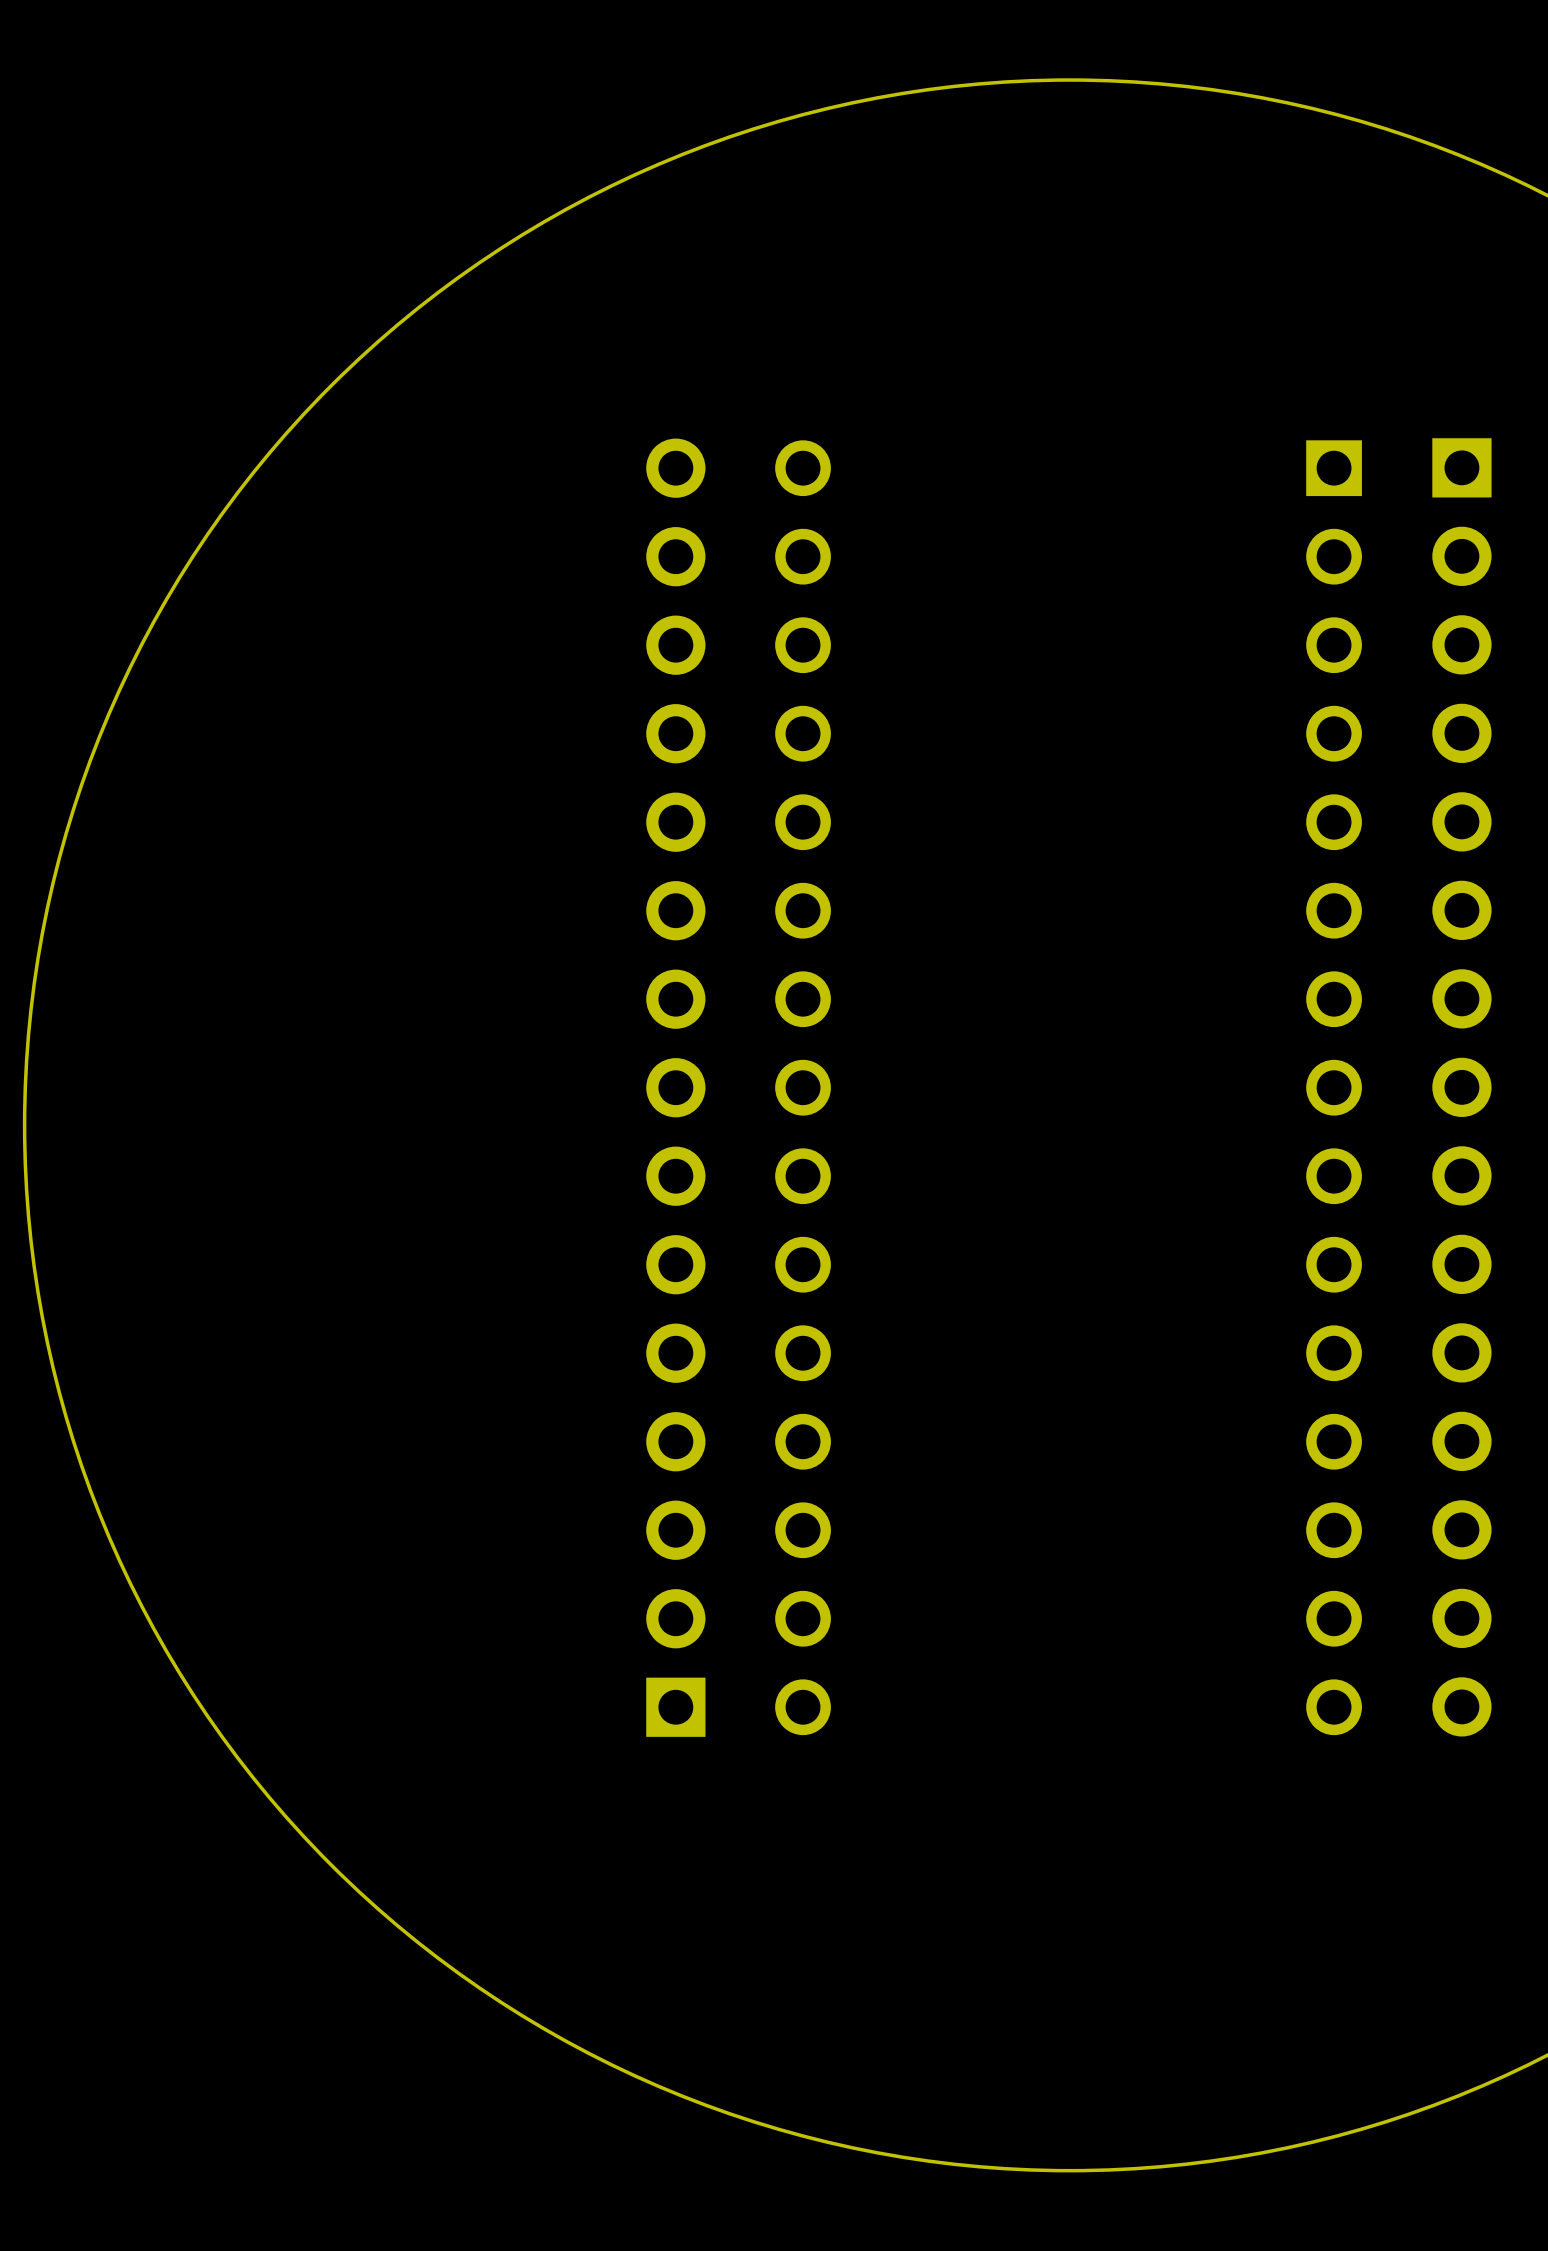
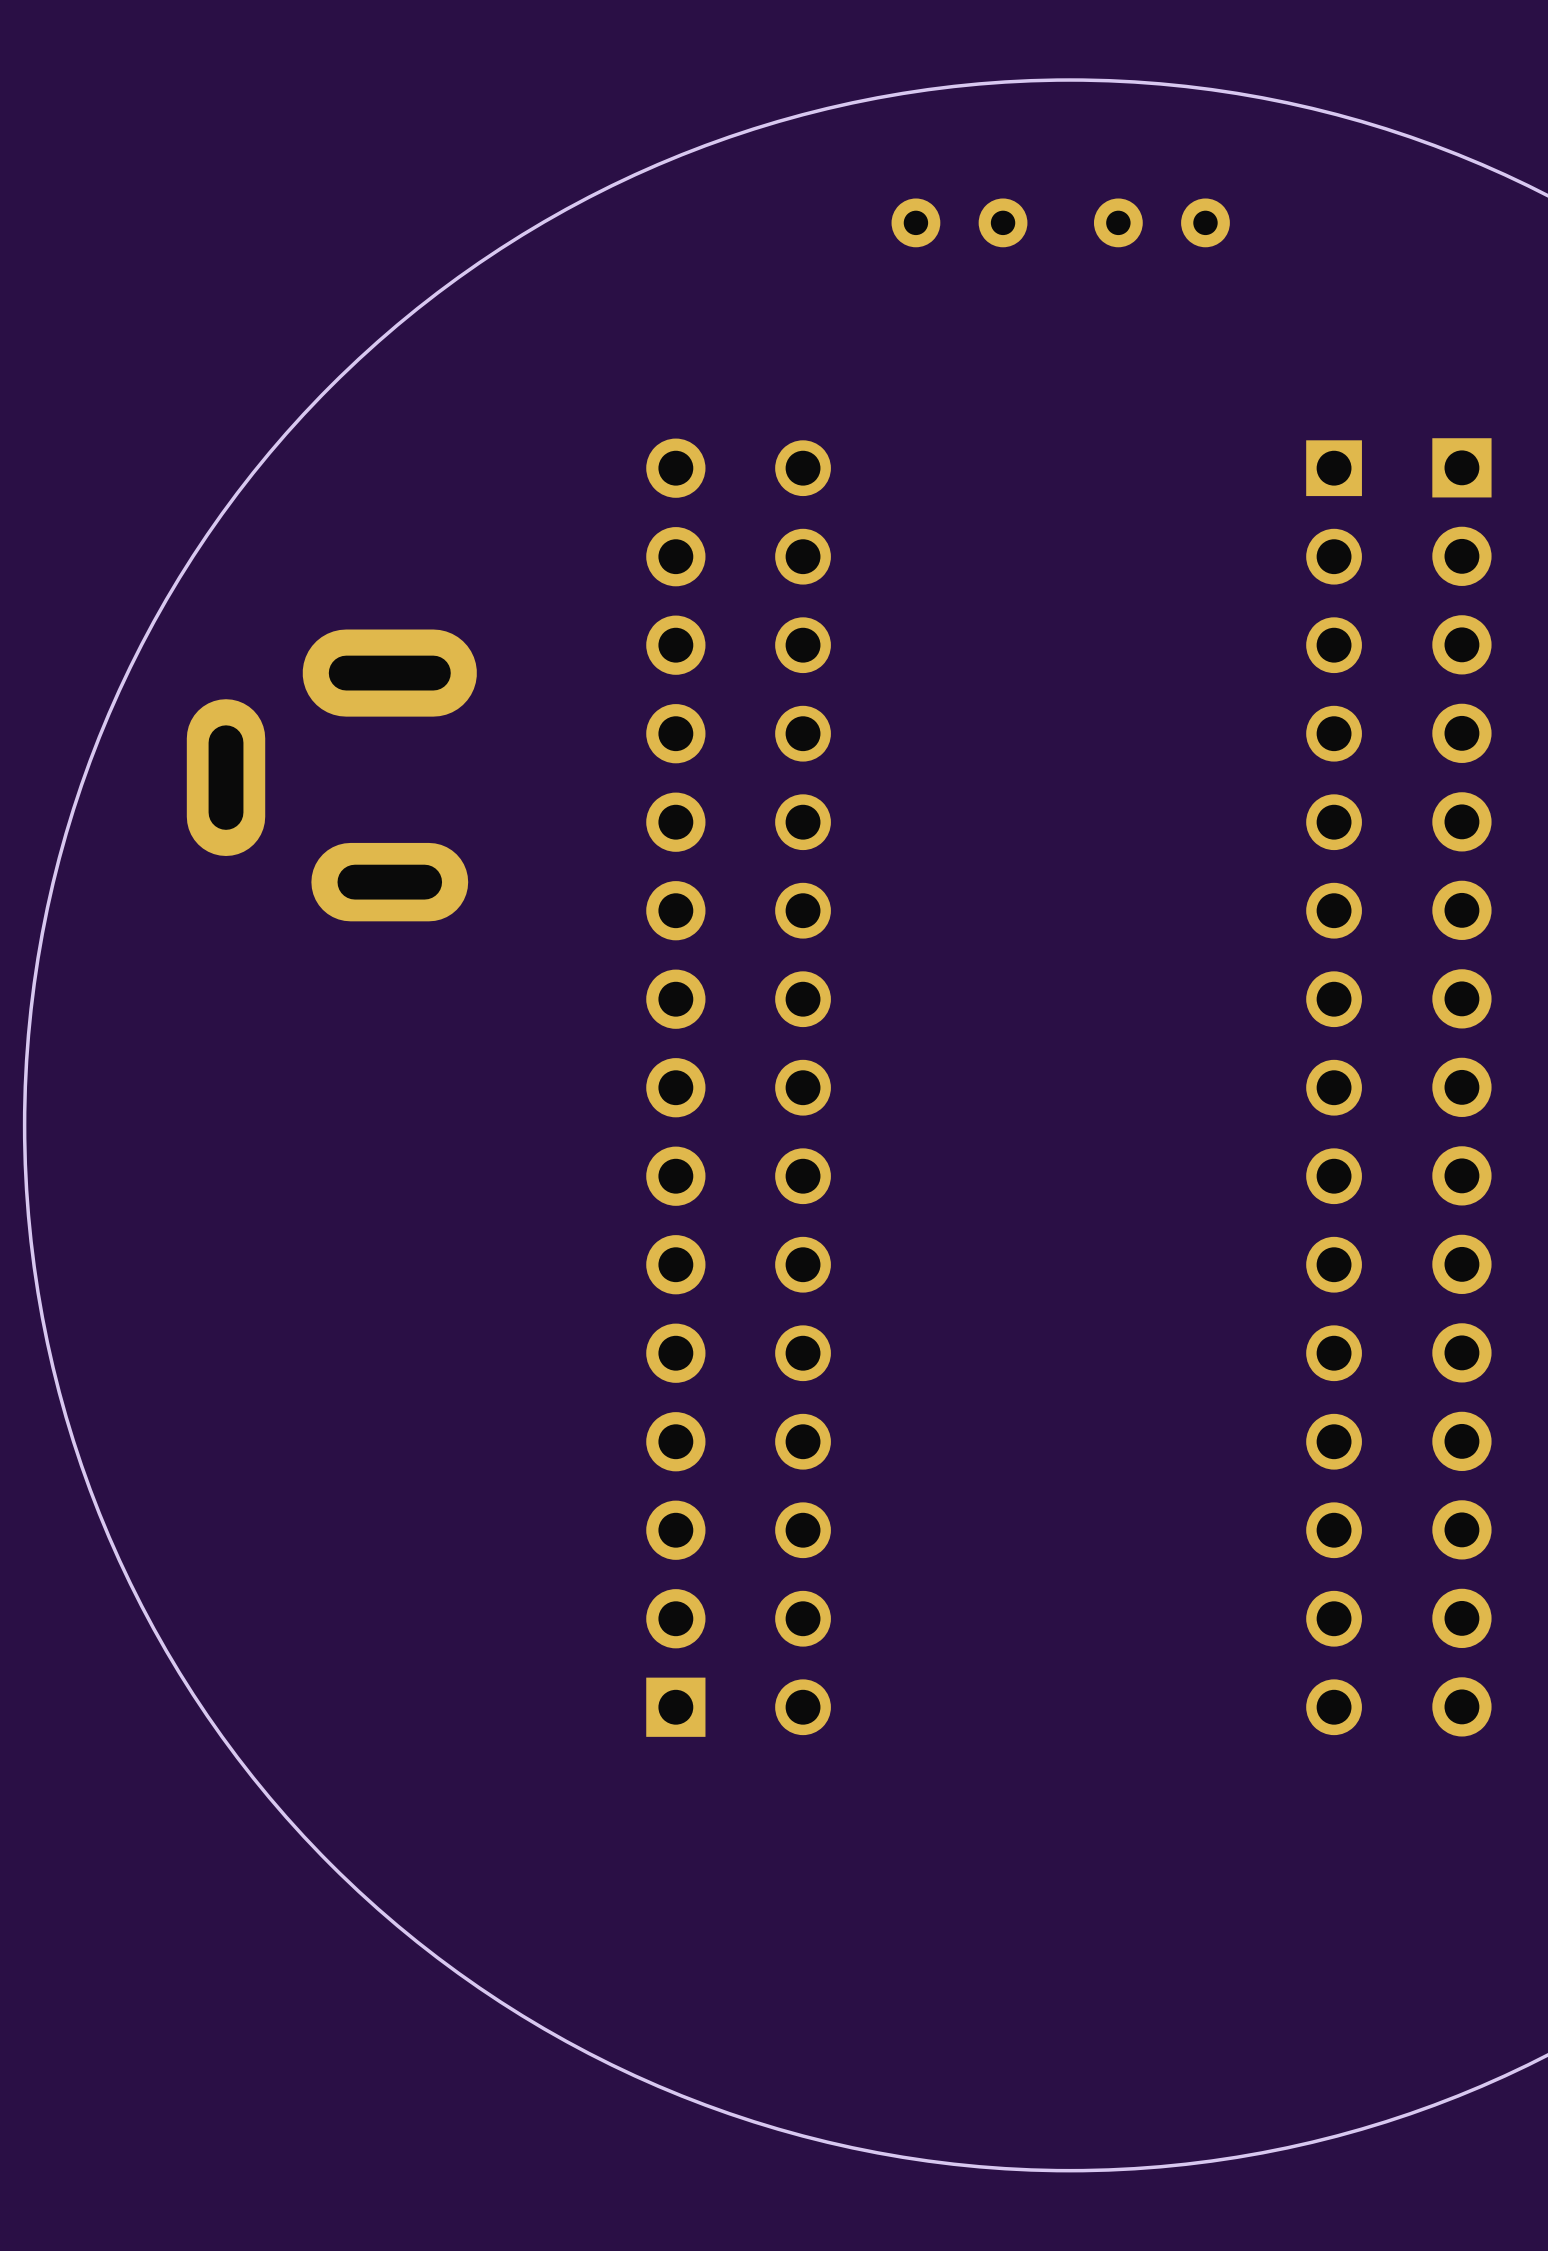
part: none -> (959, 222)
part: none -> (1161, 222)
part: none -> (331, 775)

